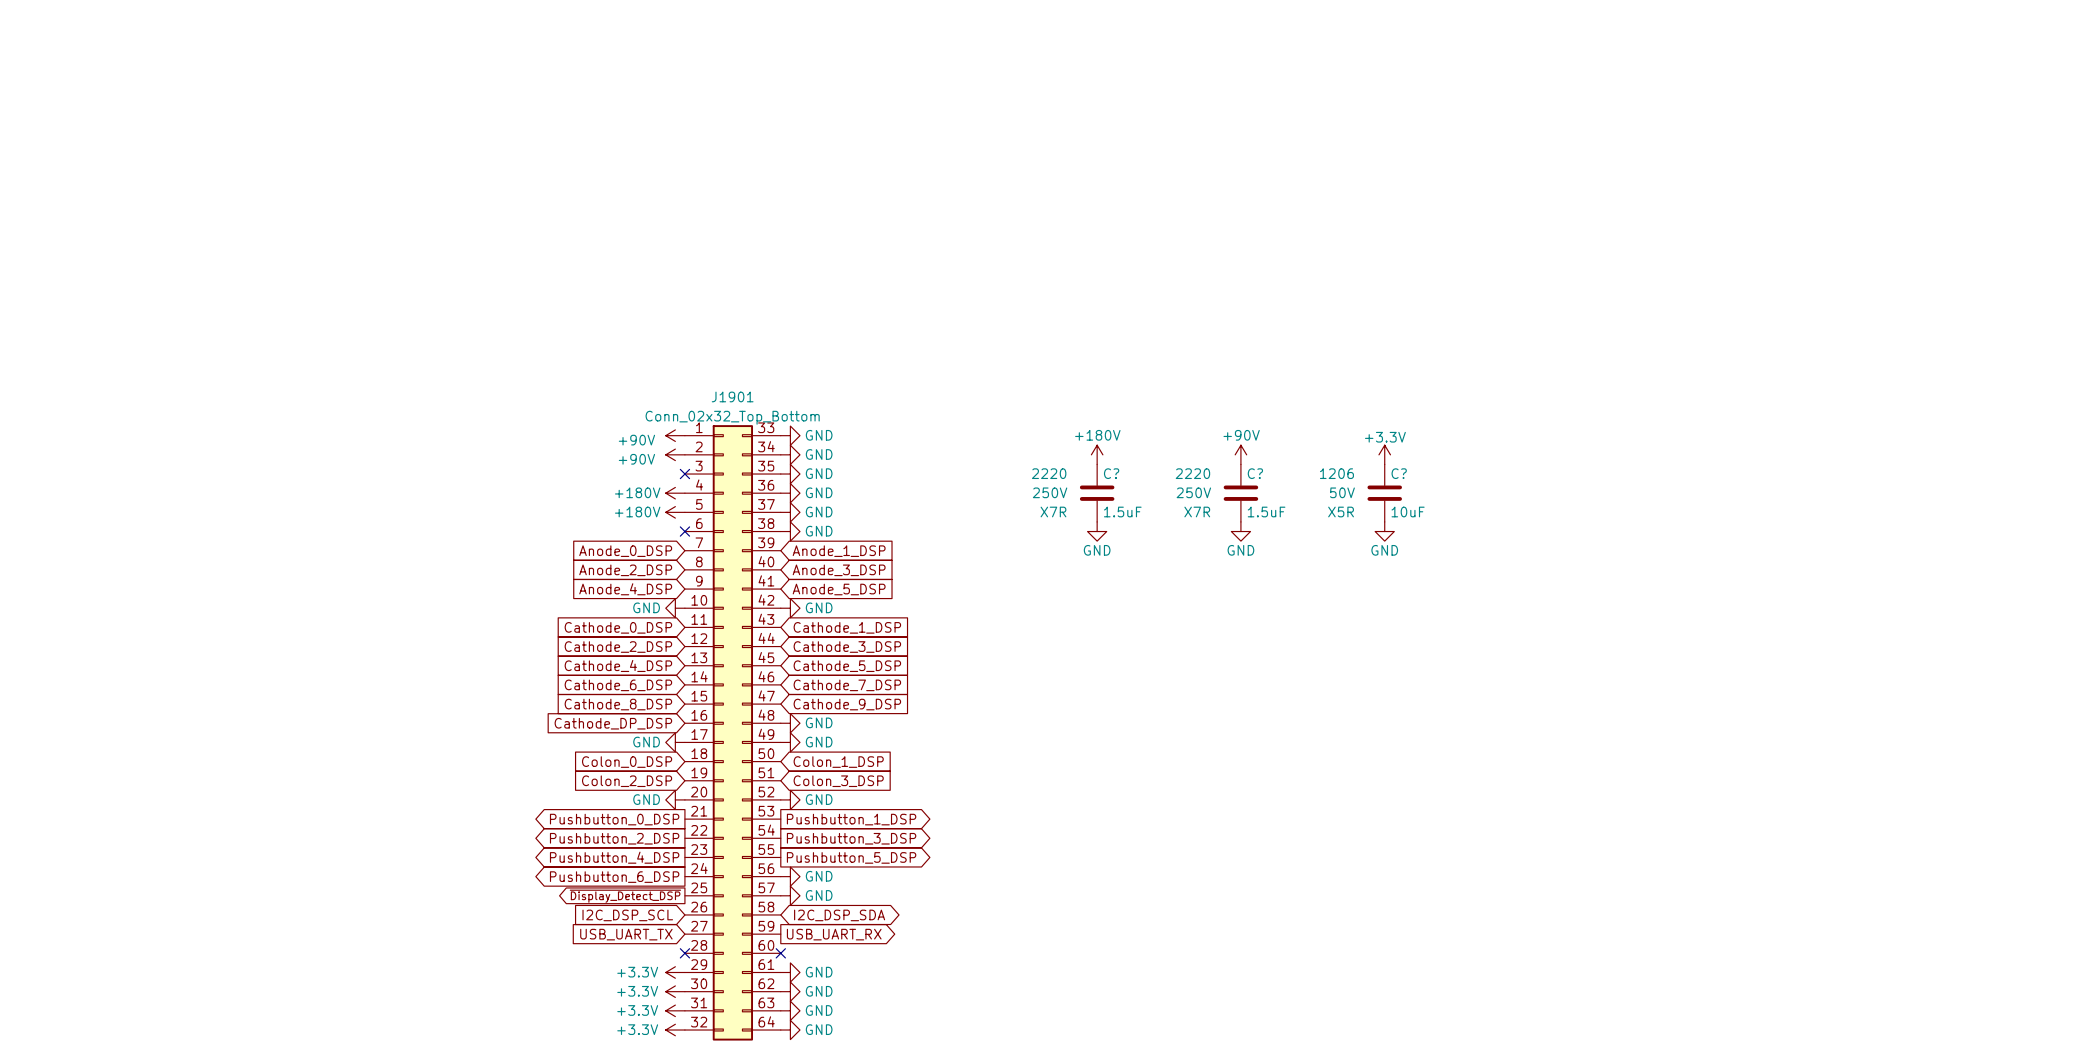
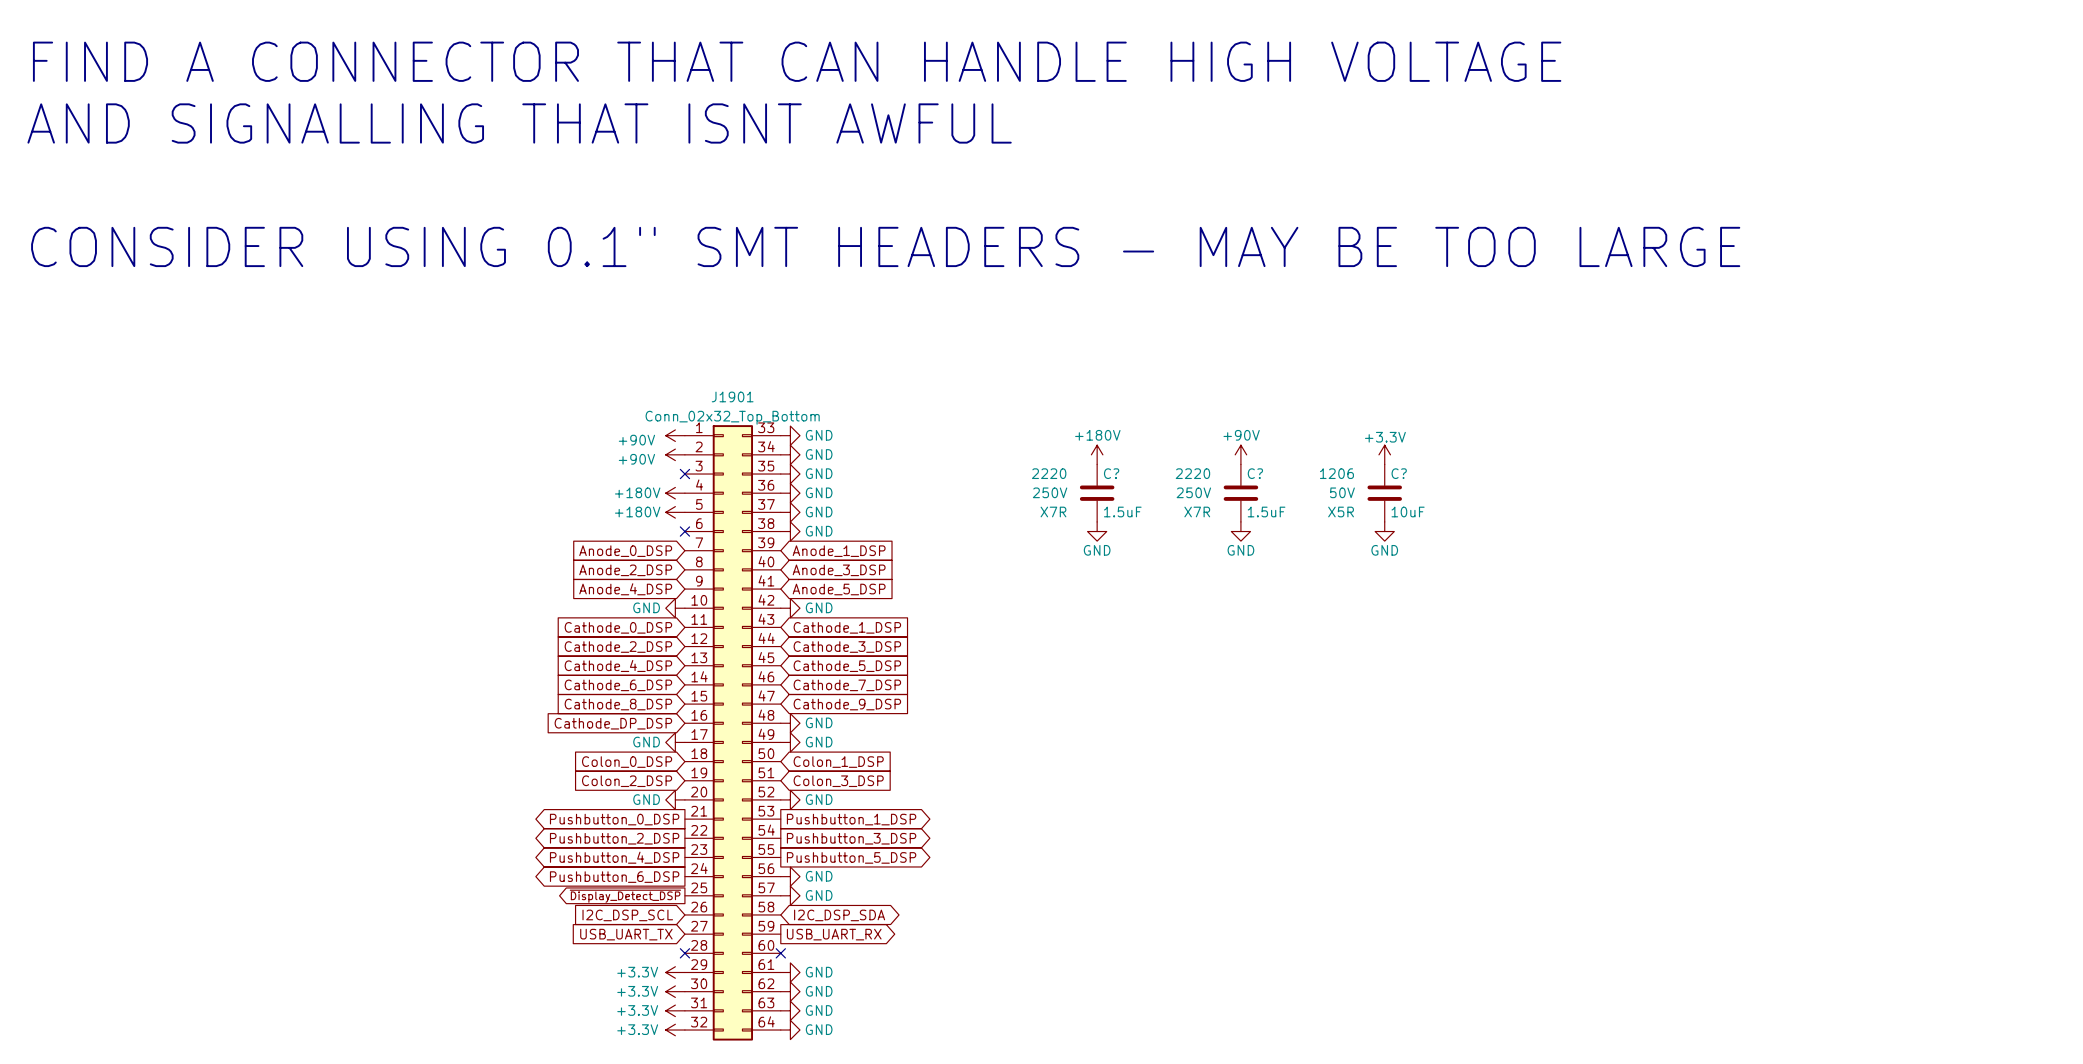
text: none -> FIND A CONNECTOR THAT CAN HANDLE HIGH VOLTAGE (797, 61)
text: none -> AND SIGNALLING THAT ISNT AWFUL (519, 123)
text: none -> CONSIDER USING 0.1" SMT HEADERS - MAY BE TOO LARGE (885, 246)

